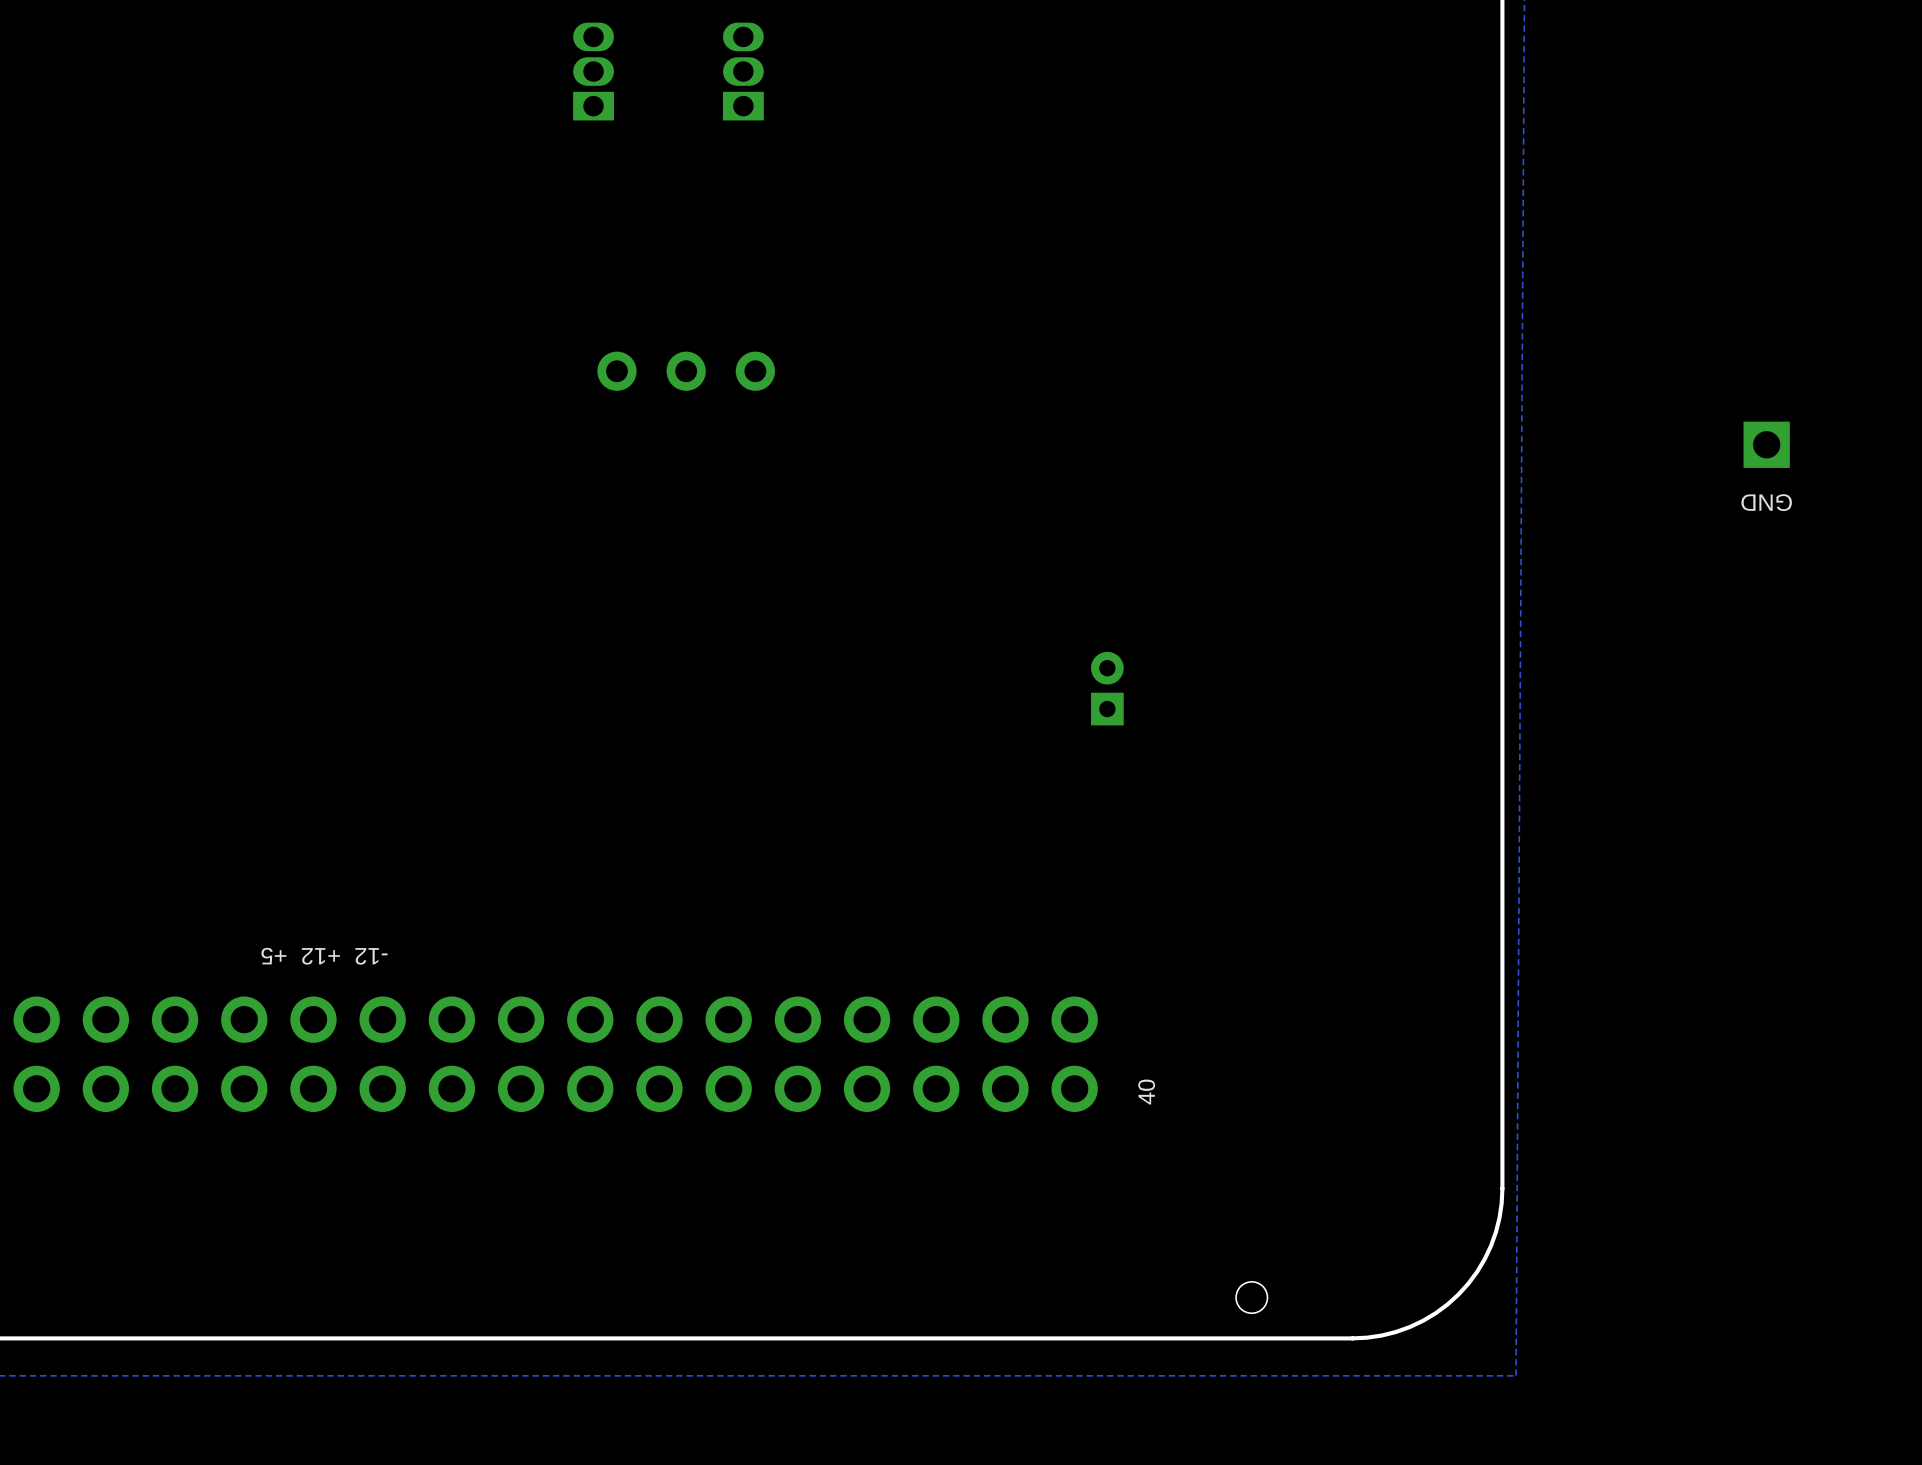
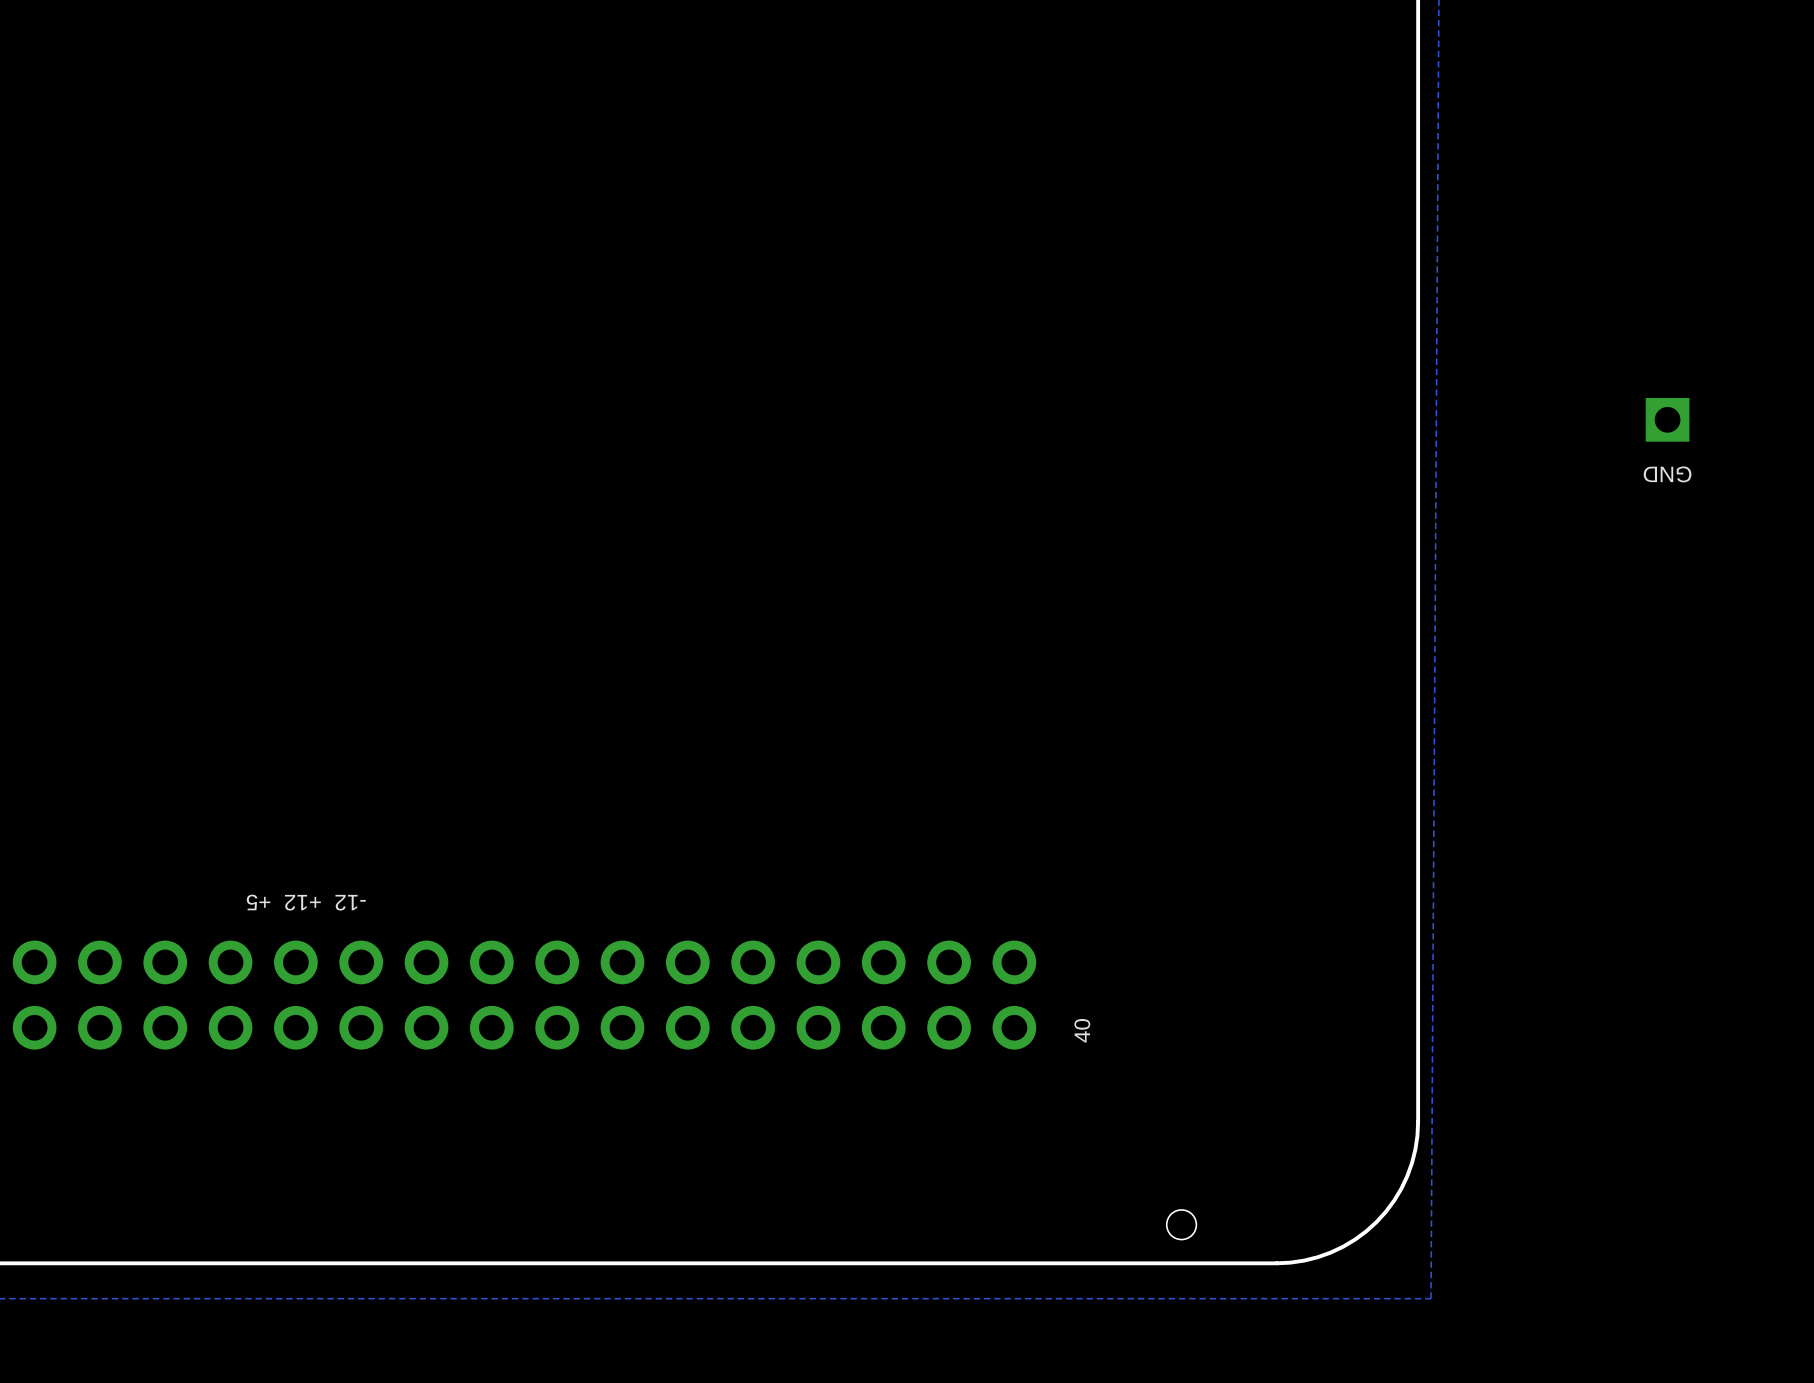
part: (593, 71) -> none
part: (743, 71) -> none
part: (686, 371) -> none
part: (1107, 688) -> none

